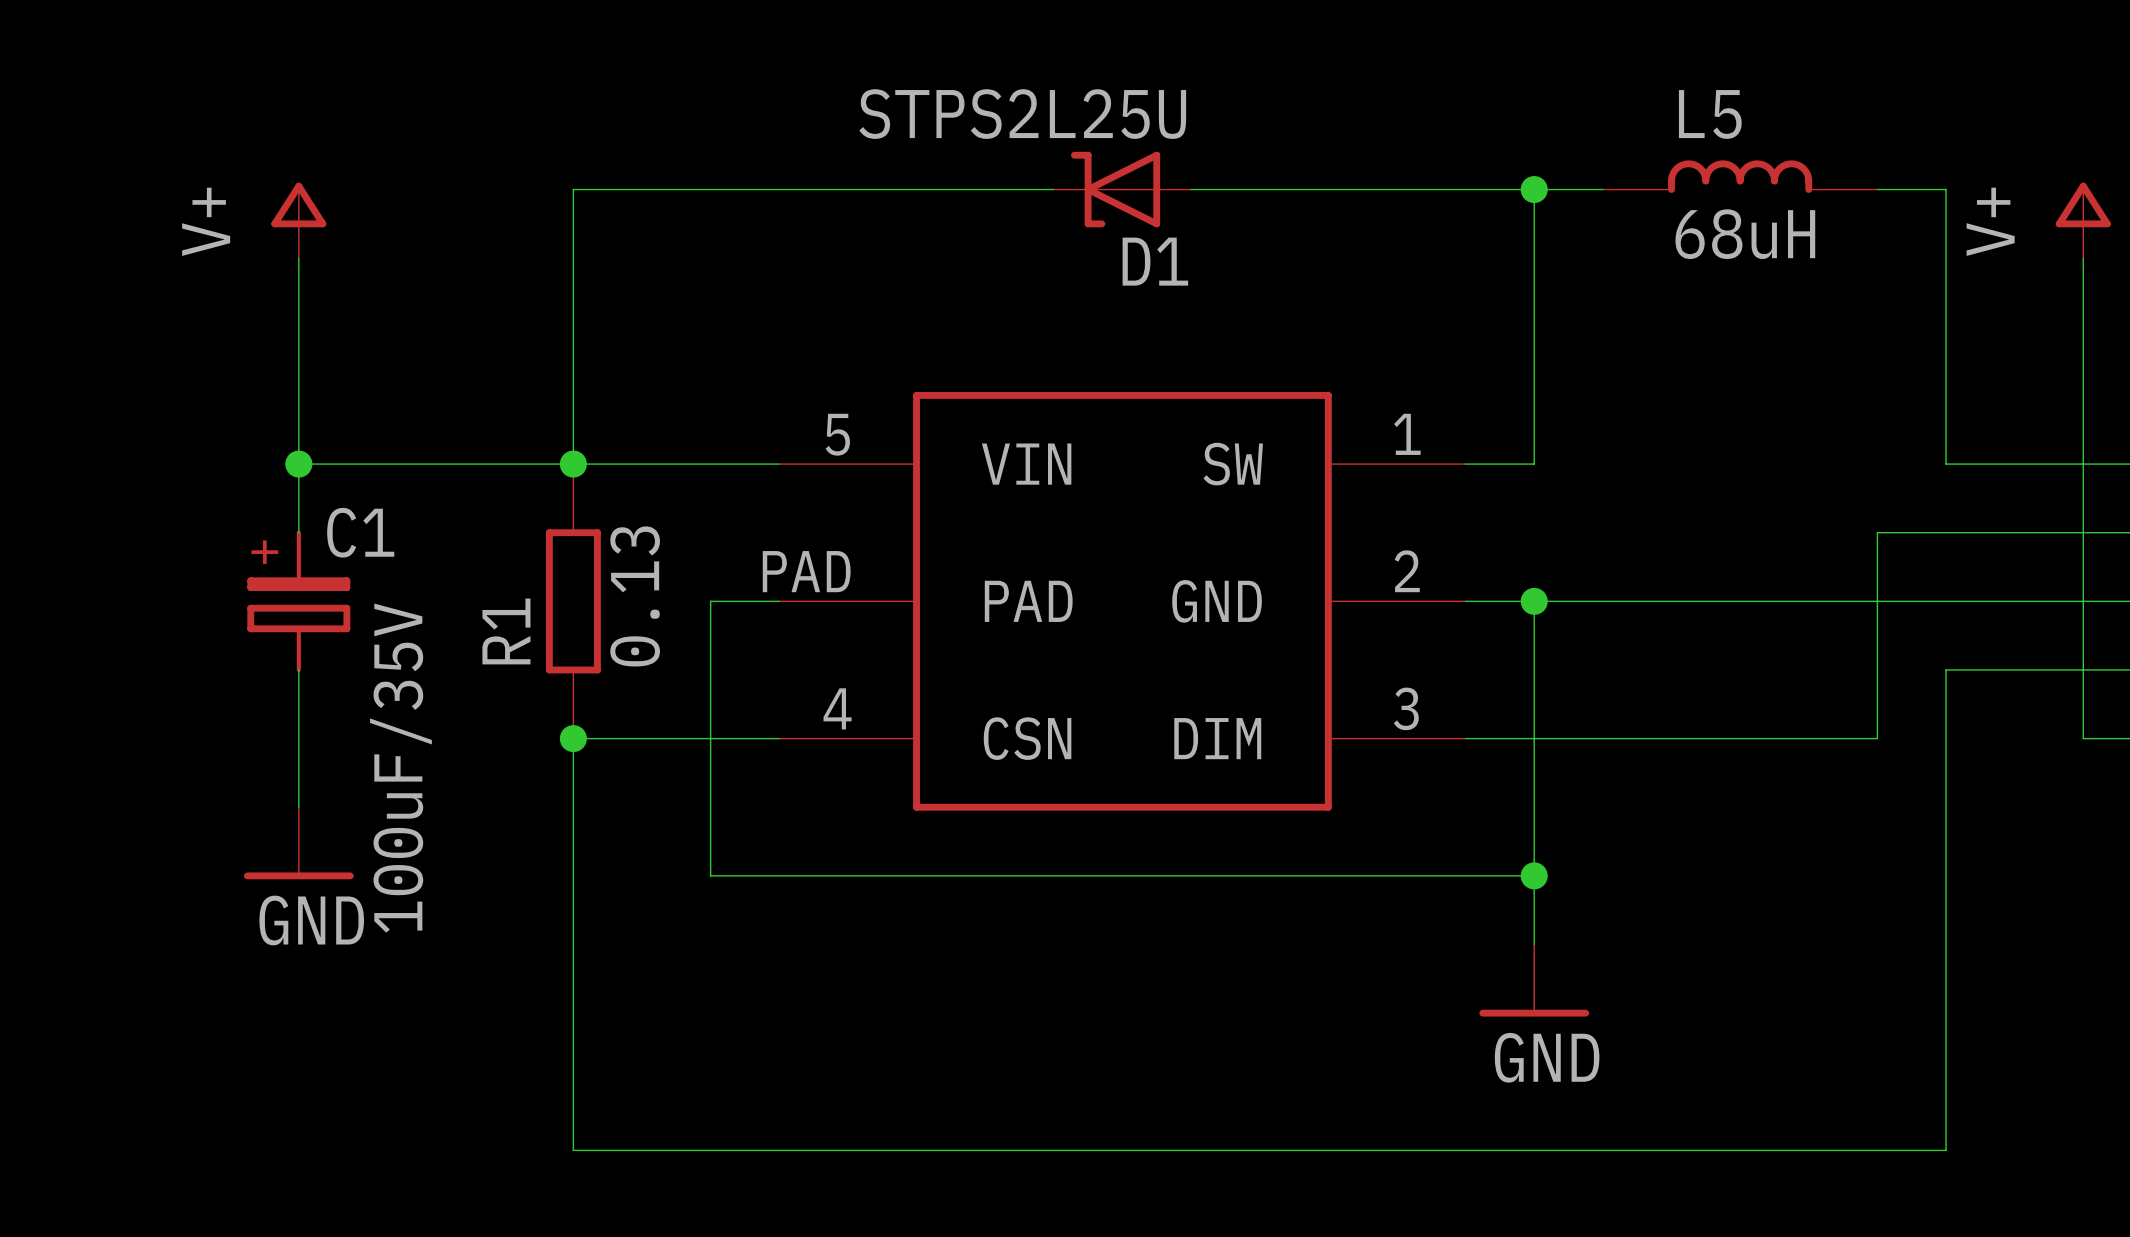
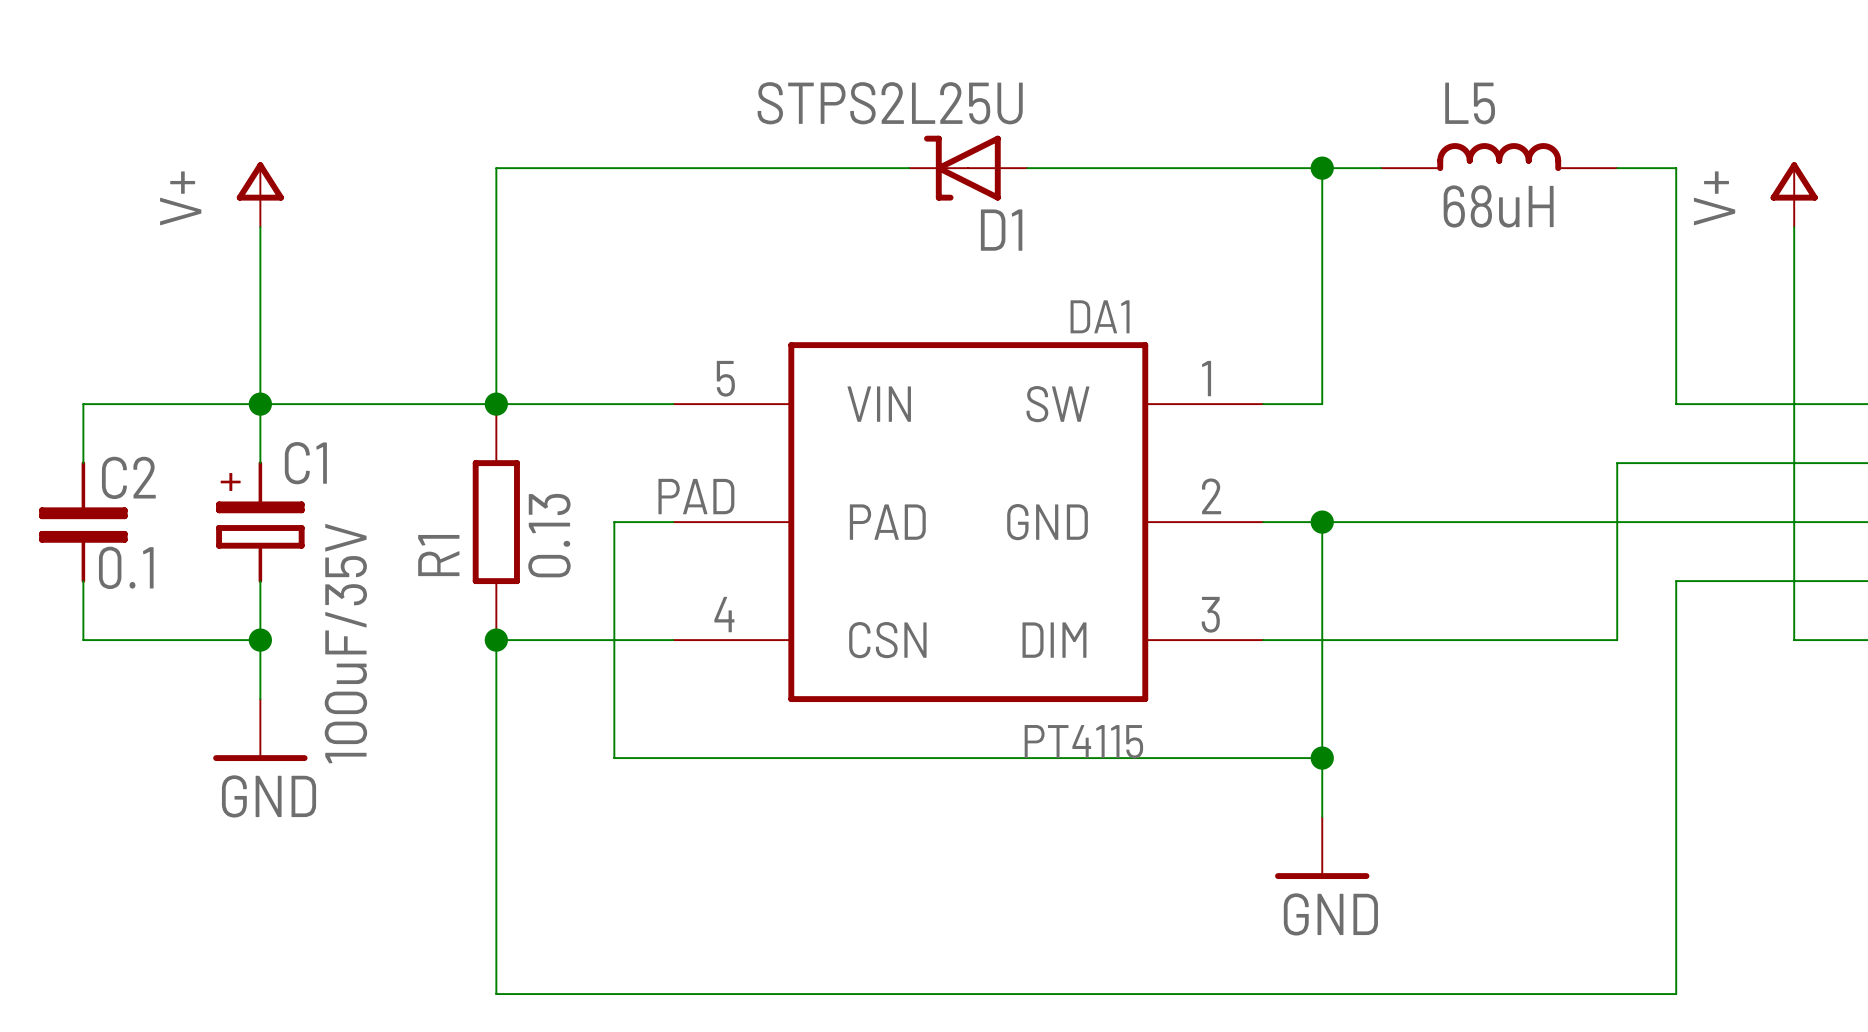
DA1 name: none -> DA1 (1100, 316)
wire: none -> (260, 404) (83, 404) (83, 463)
C2: none -> 0.1 (83, 522)
wire: none -> (83, 581) (83, 640) (260, 640)
junction: none -> (260, 640)
DA1 value: none -> PT4115 (1083, 741)

